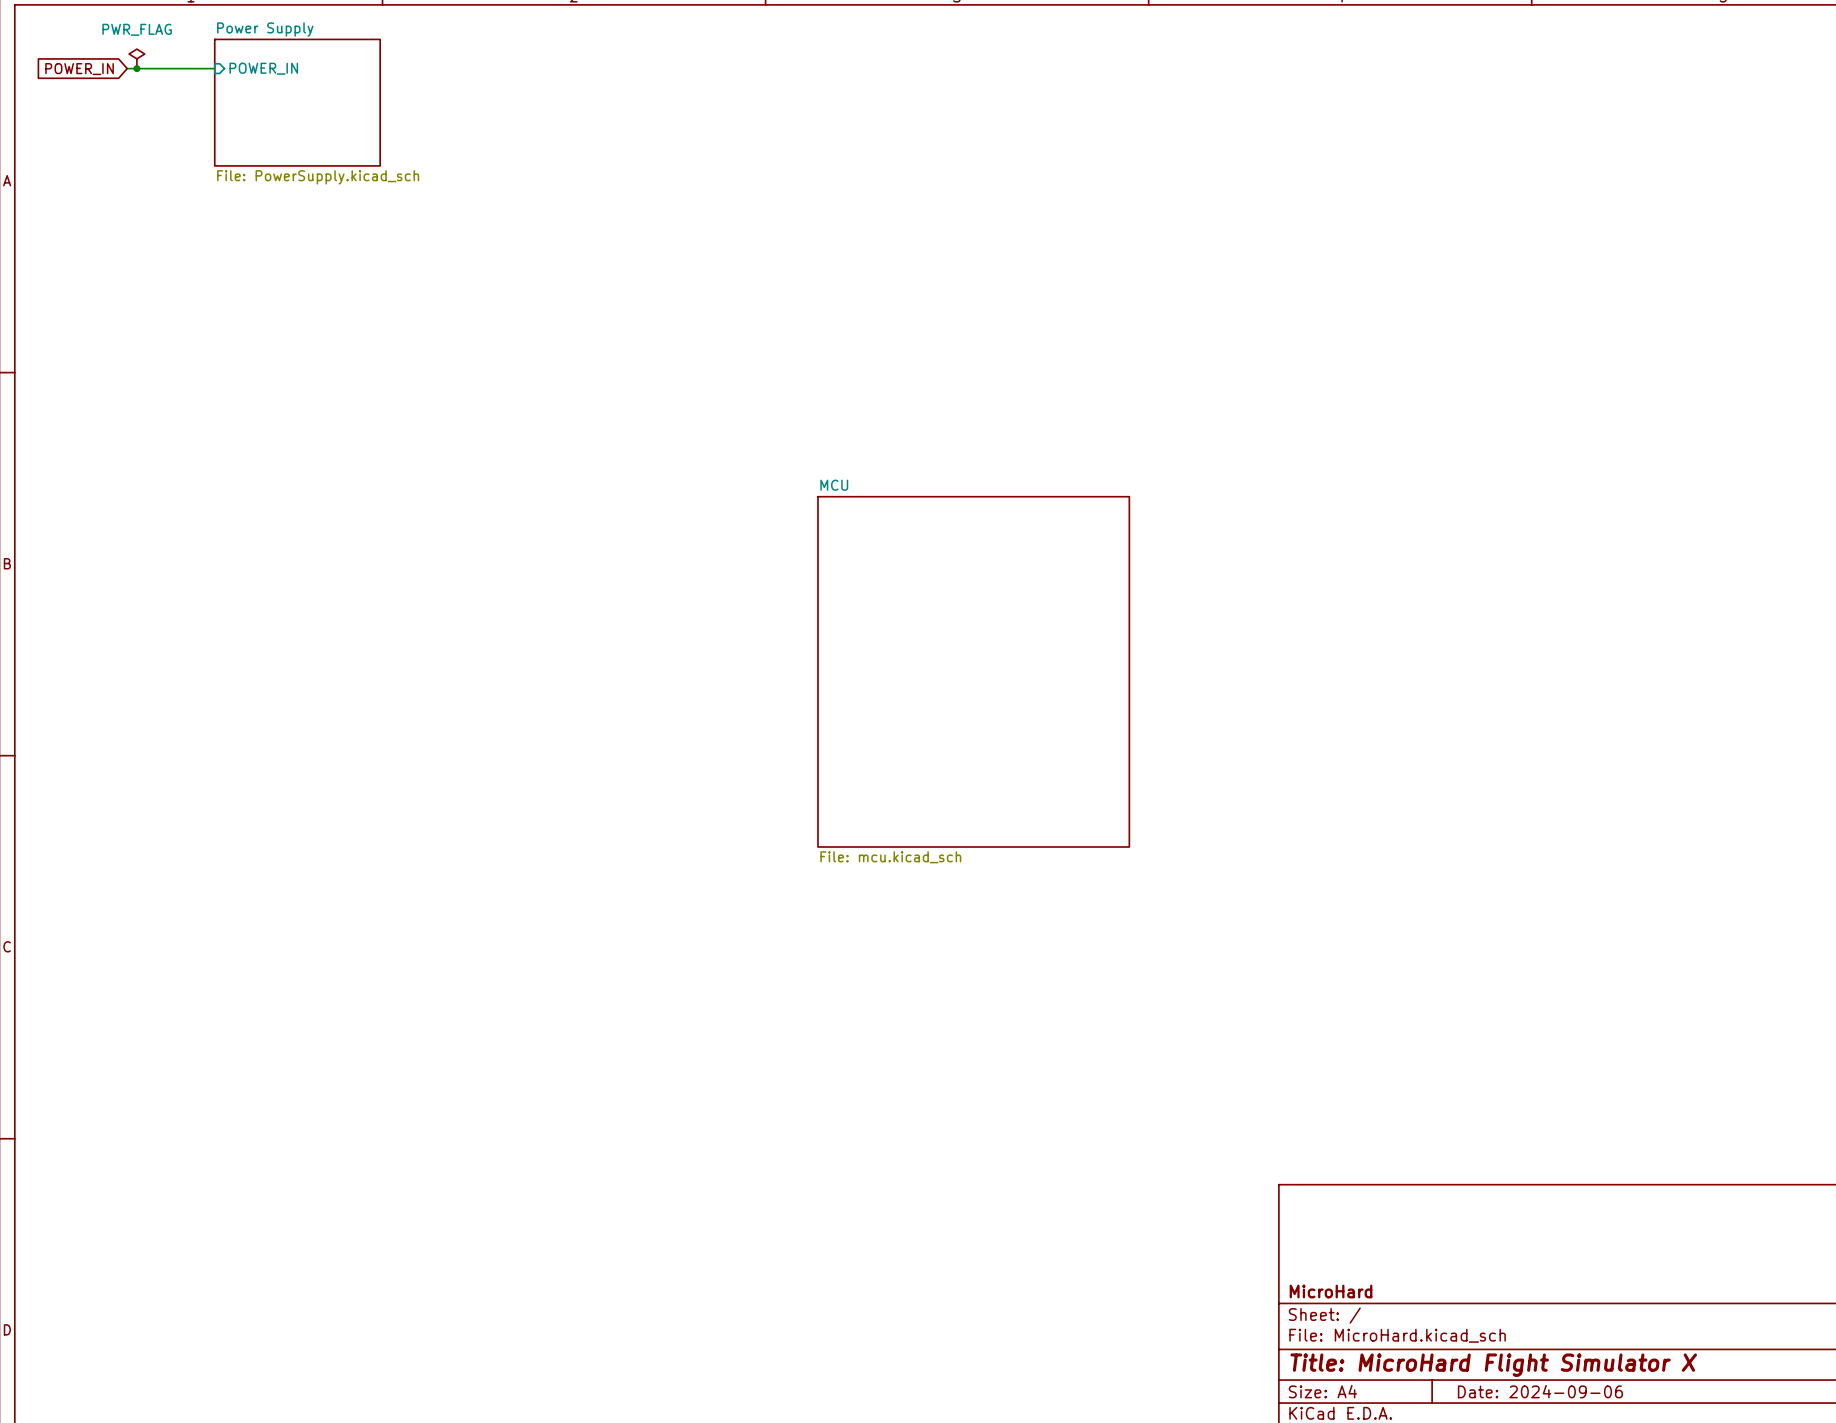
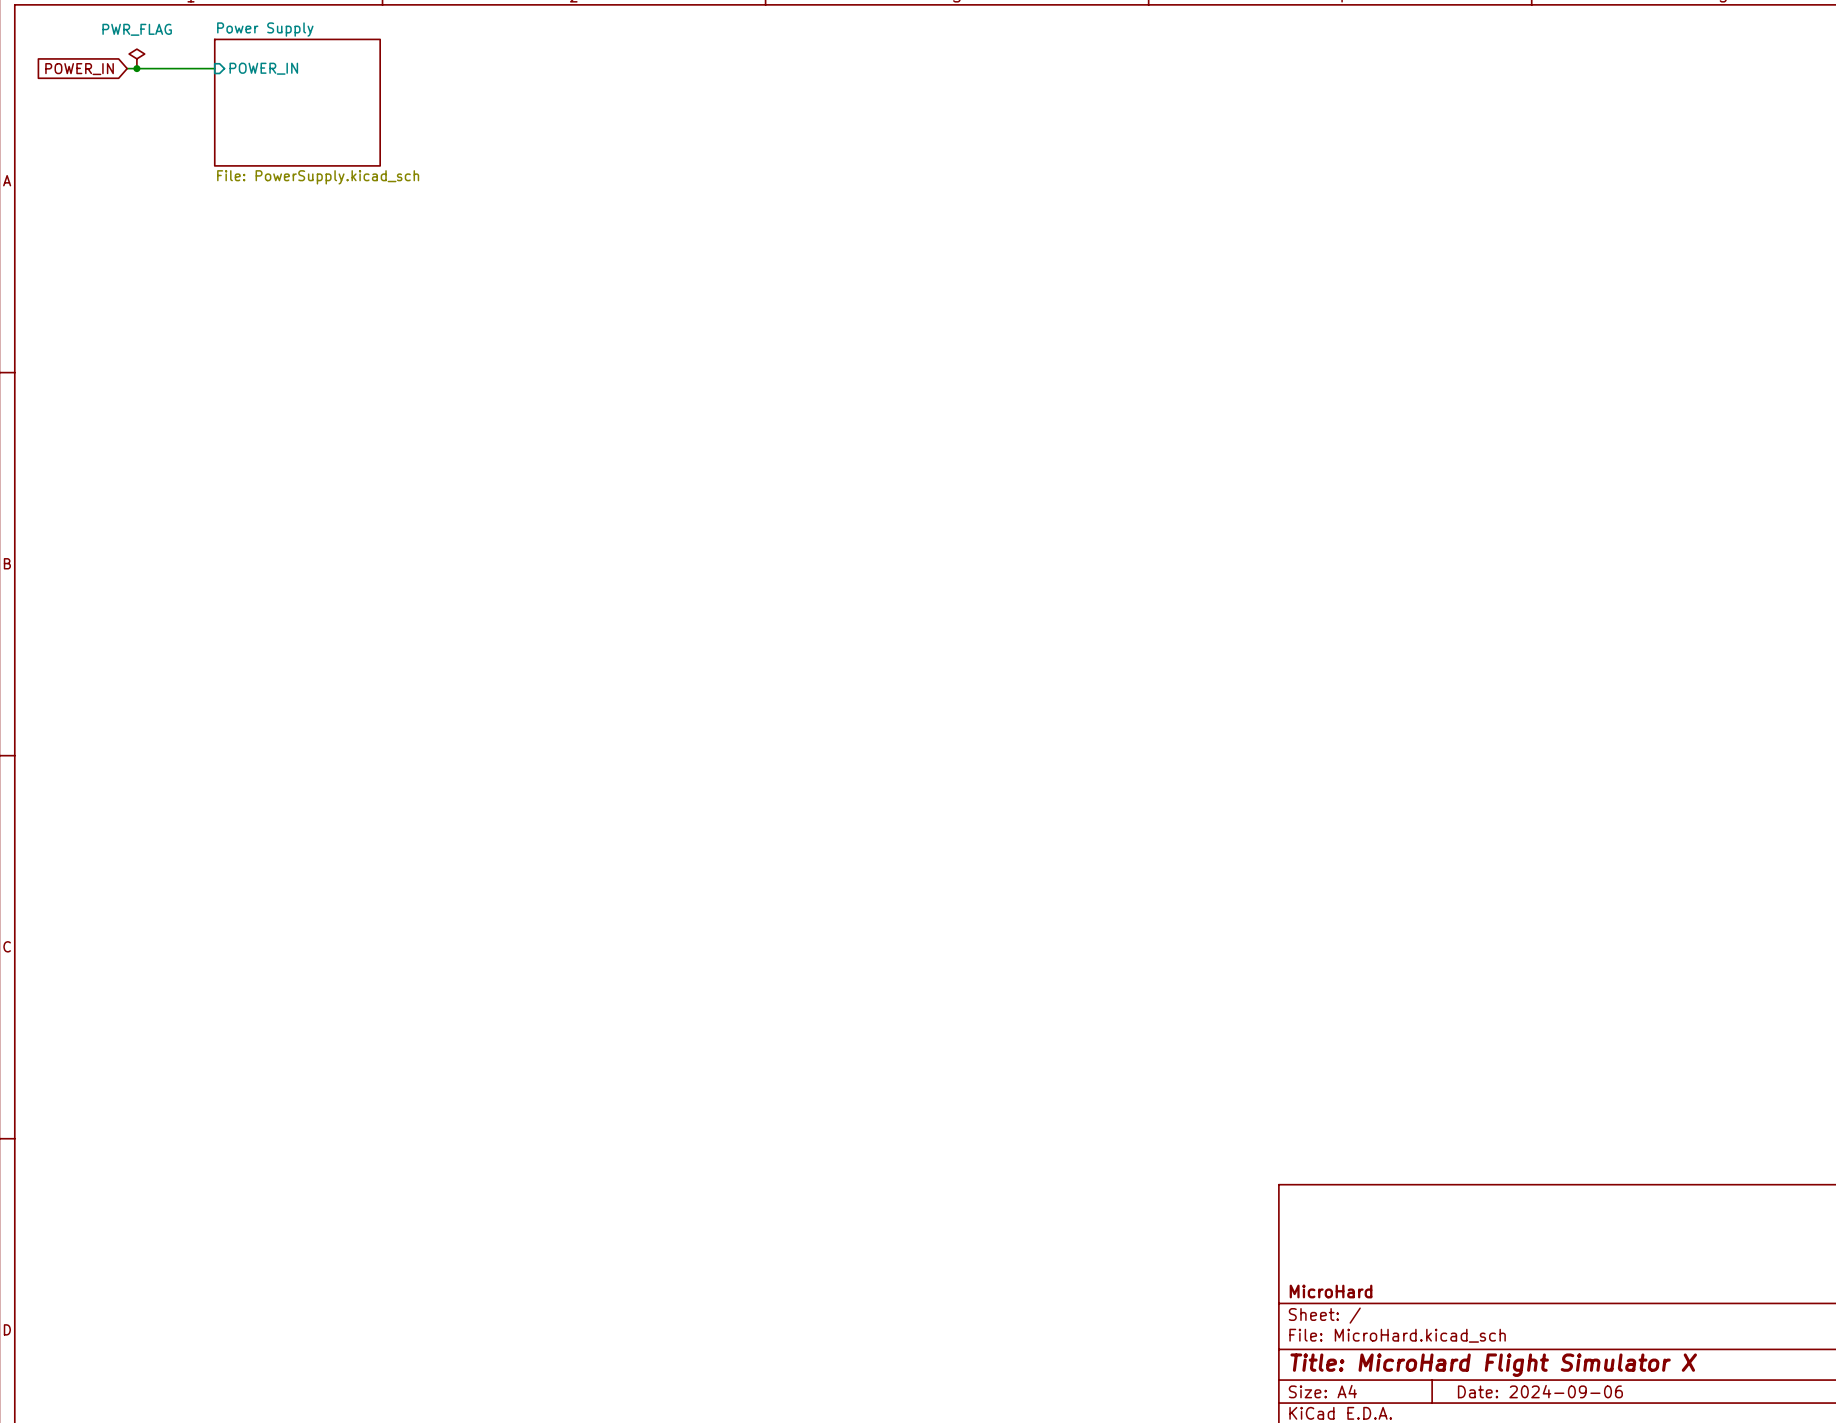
sheet MCU: File: mcu.kicad_sch (973, 671) -> none

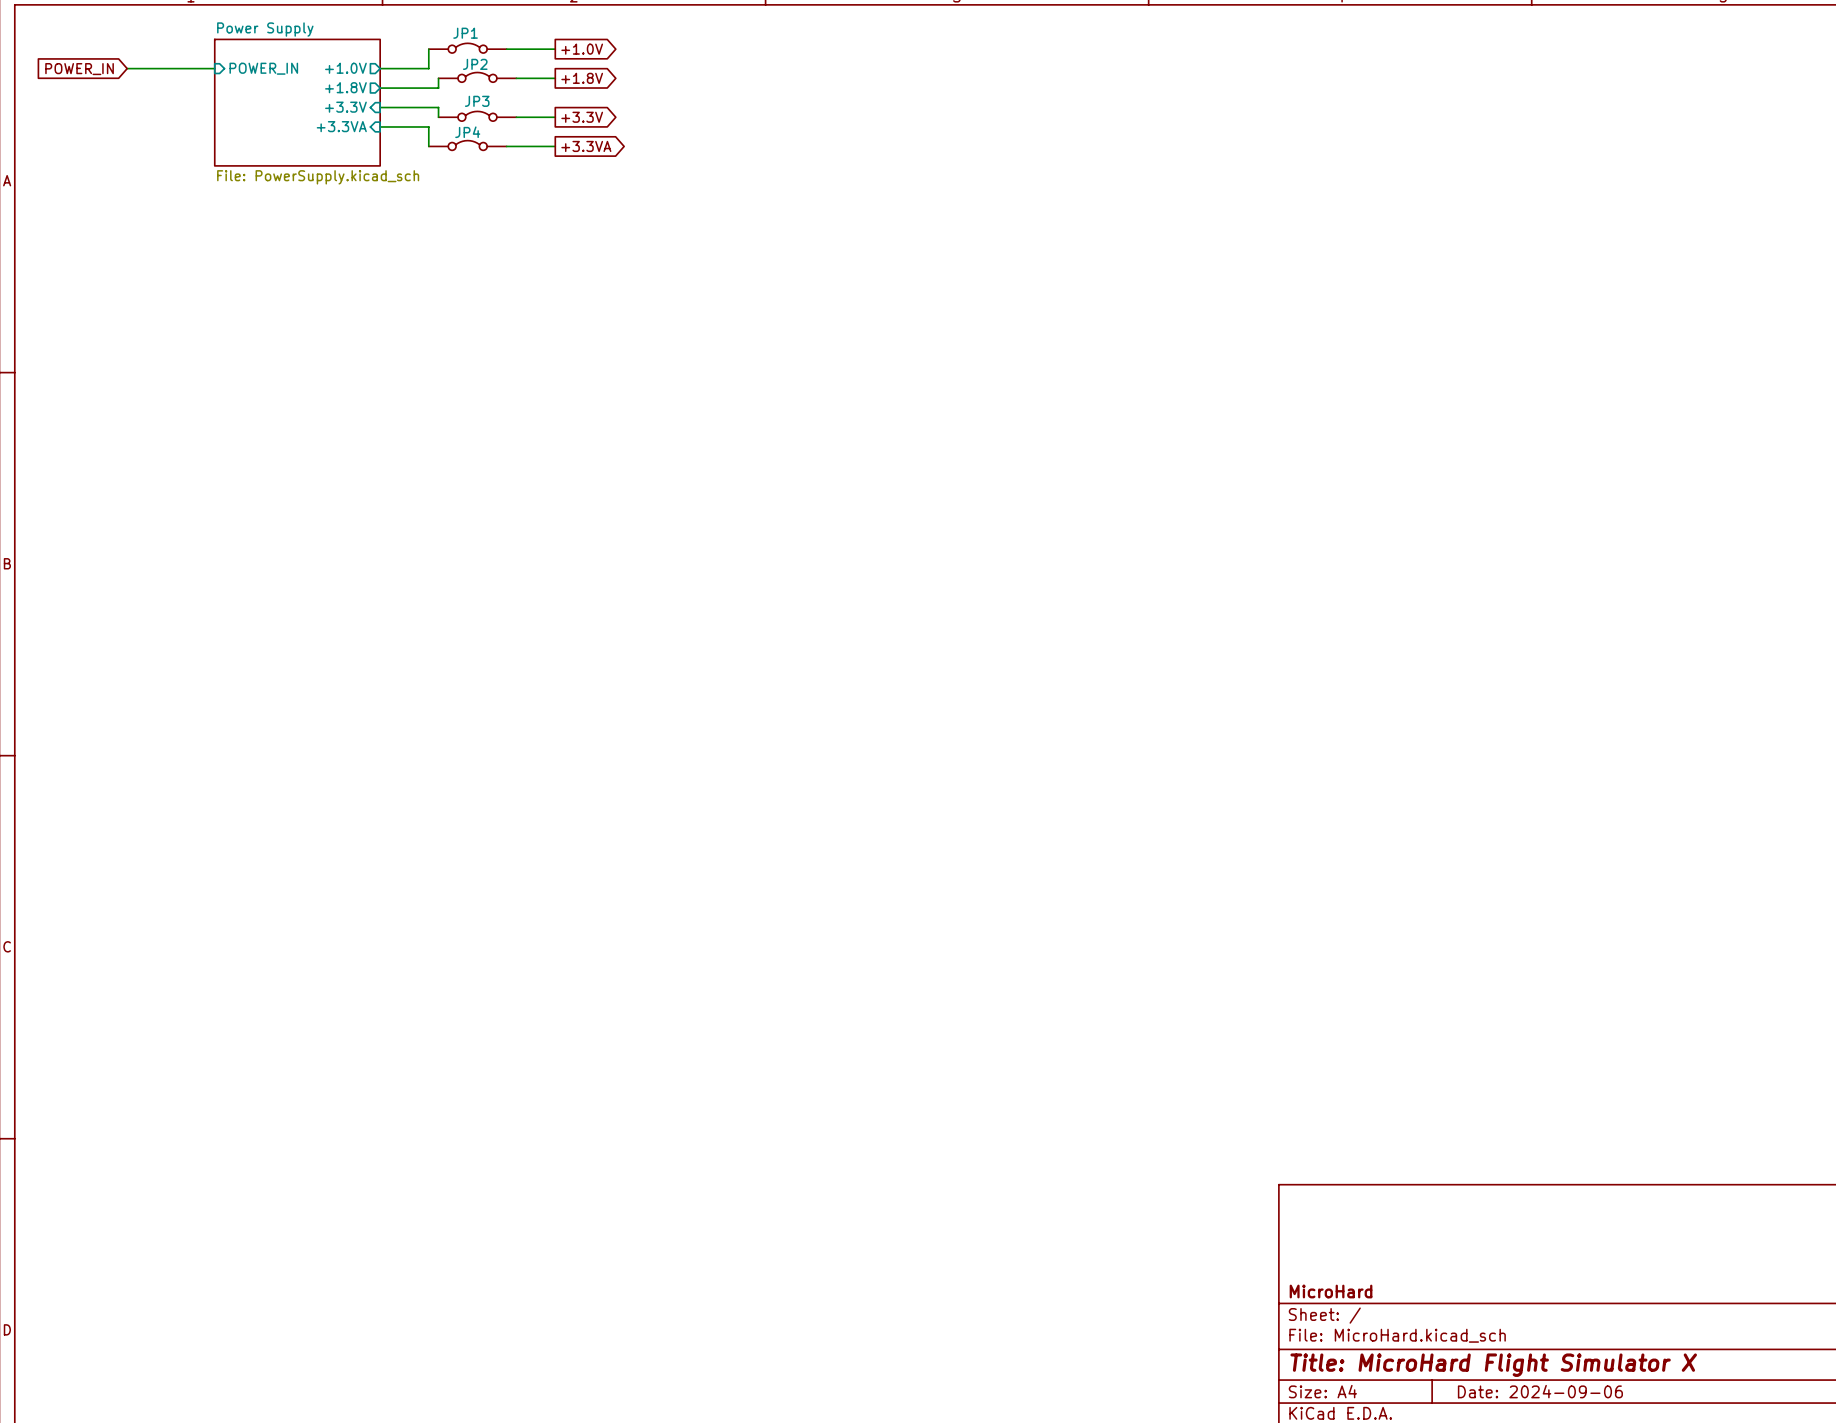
JP1: none -> (467, 48)
wire: none -> (428, 49) (428, 68) (380, 68)
wire: none -> (506, 49) (555, 49)
global label: none -> +1.0V (582, 49)
power symbol: PWR_FLAG (136, 58) -> none
junction: (136, 68) -> none
sheet pin: none -> +1.0V (345, 68)
JP2: none -> (477, 77)
wire: none -> (438, 78) (438, 88) (380, 88)
wire: none -> (516, 78) (555, 78)
global label: none -> +1.8V (582, 78)
sheet pin: none -> +1.8V (345, 87)
sheet pin: none -> +3.3V (345, 107)
wire: none -> (380, 107) (438, 107) (438, 117)
JP3: none -> (477, 116)
wire: none -> (516, 117) (555, 117)
global label: none -> +3.3V (582, 117)
sheet pin: none -> +3.3VA (341, 126)
wire: none -> (380, 126) (428, 126) (428, 146)
JP4: none -> (467, 145)
wire: none -> (506, 146) (555, 146)
global label: none -> +3.3VA (586, 146)

